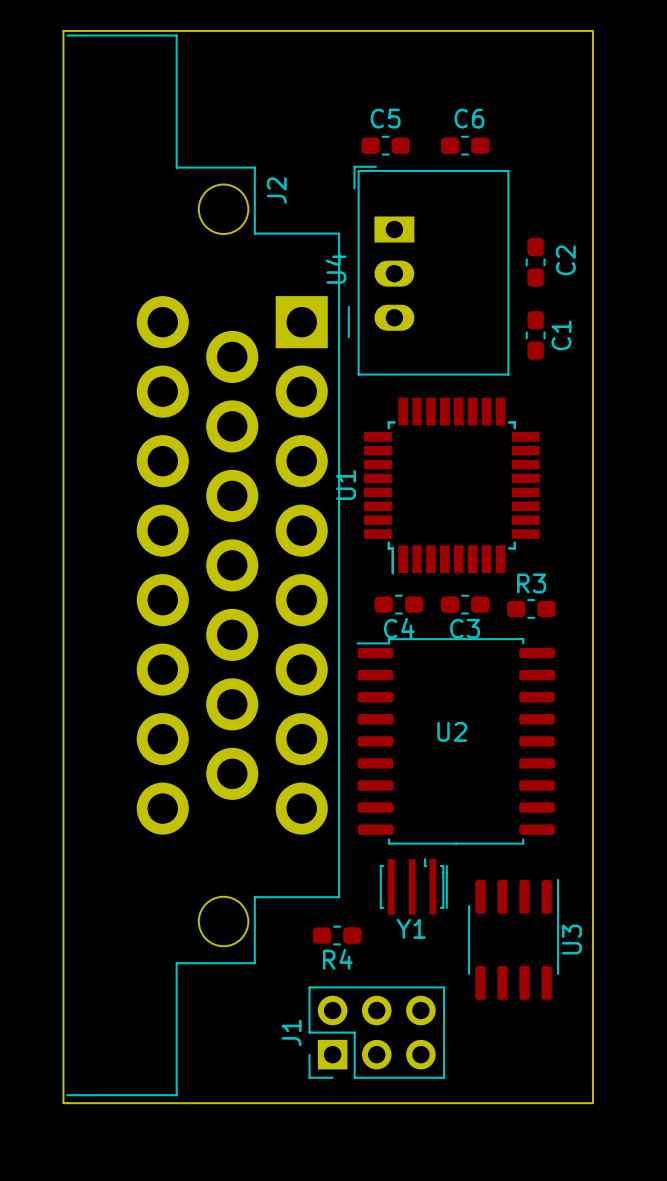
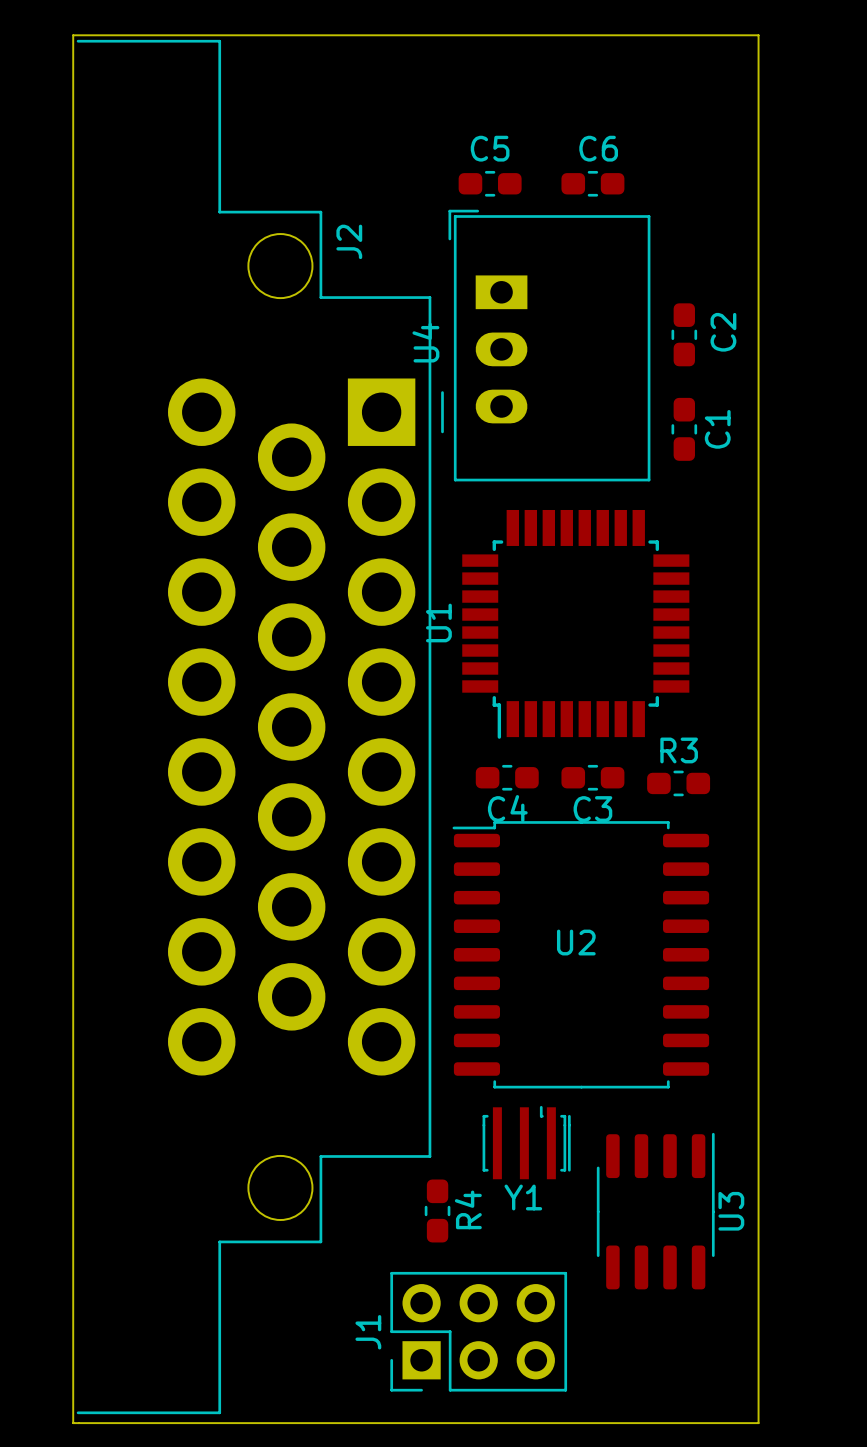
R4 rotation: 0° (337, 935) -> 90° clockwise (437, 1210)
R4 name position: R4 (337, 959) -> R4 (468, 1209)

